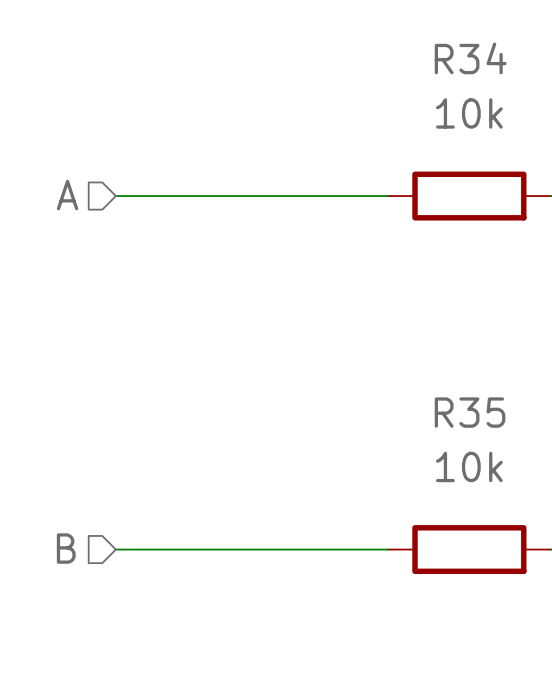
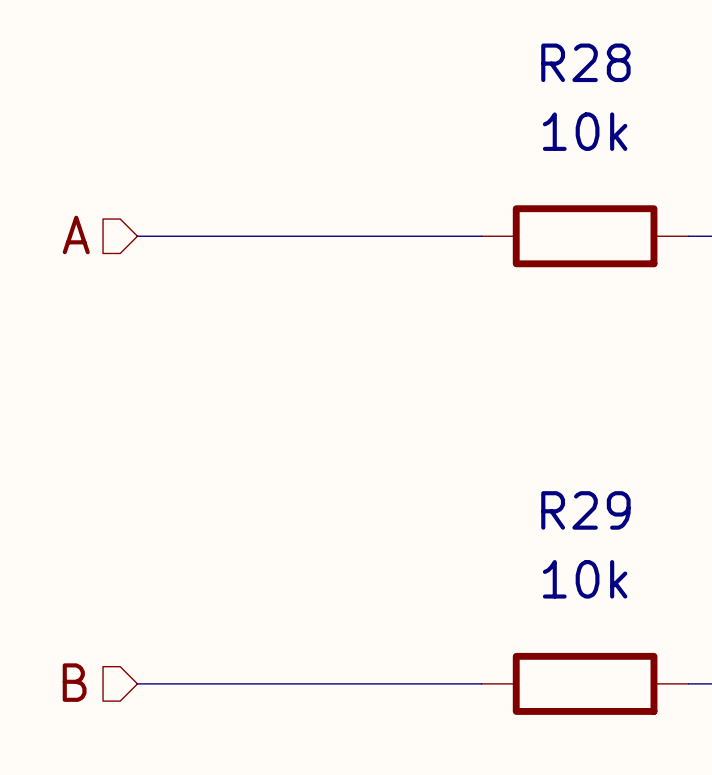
R34 name: R34 (470, 58) -> R28 (585, 62)
R35 name: R35 (470, 412) -> R29 (585, 510)

